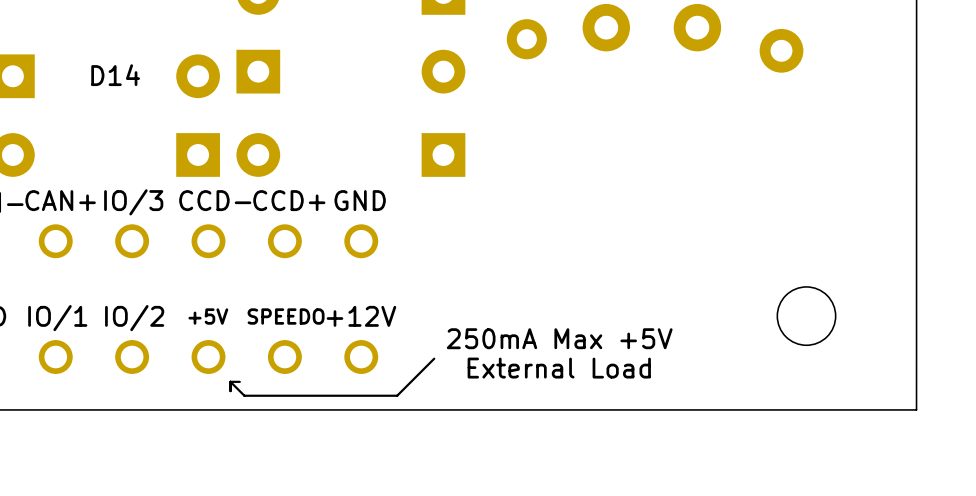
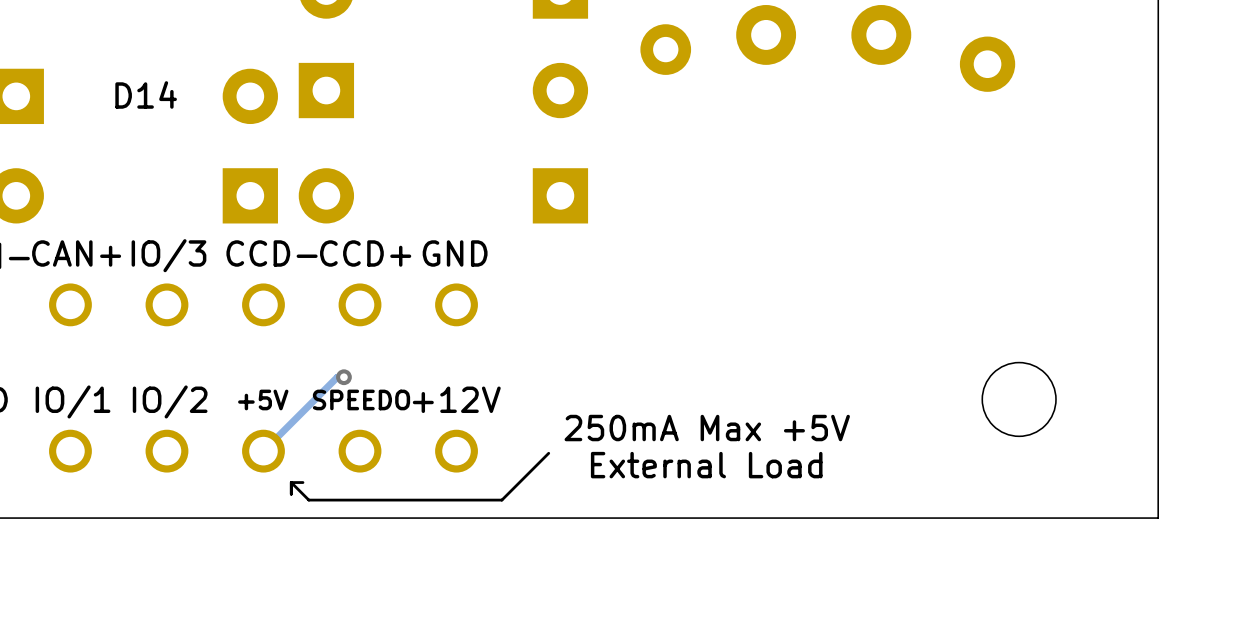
track: none -> (343, 377) (337, 377) (263, 451)
via: none -> (343, 377)

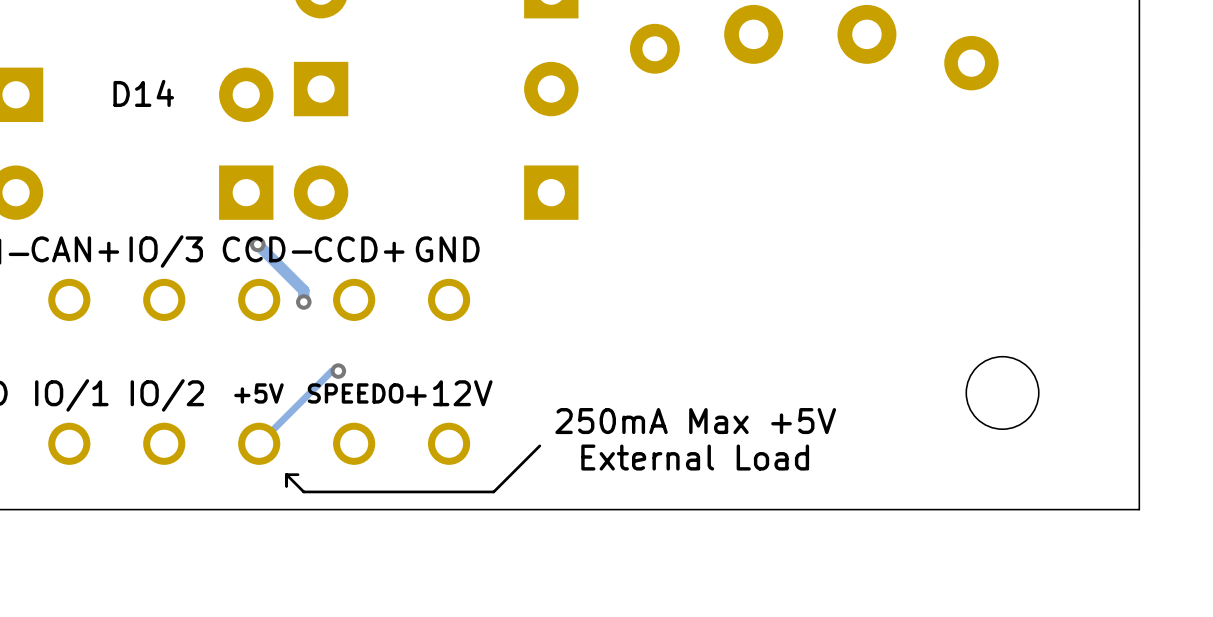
track: none -> (257, 244) (303, 290) (303, 302)
via: none -> (257, 244)
via: none -> (303, 302)

